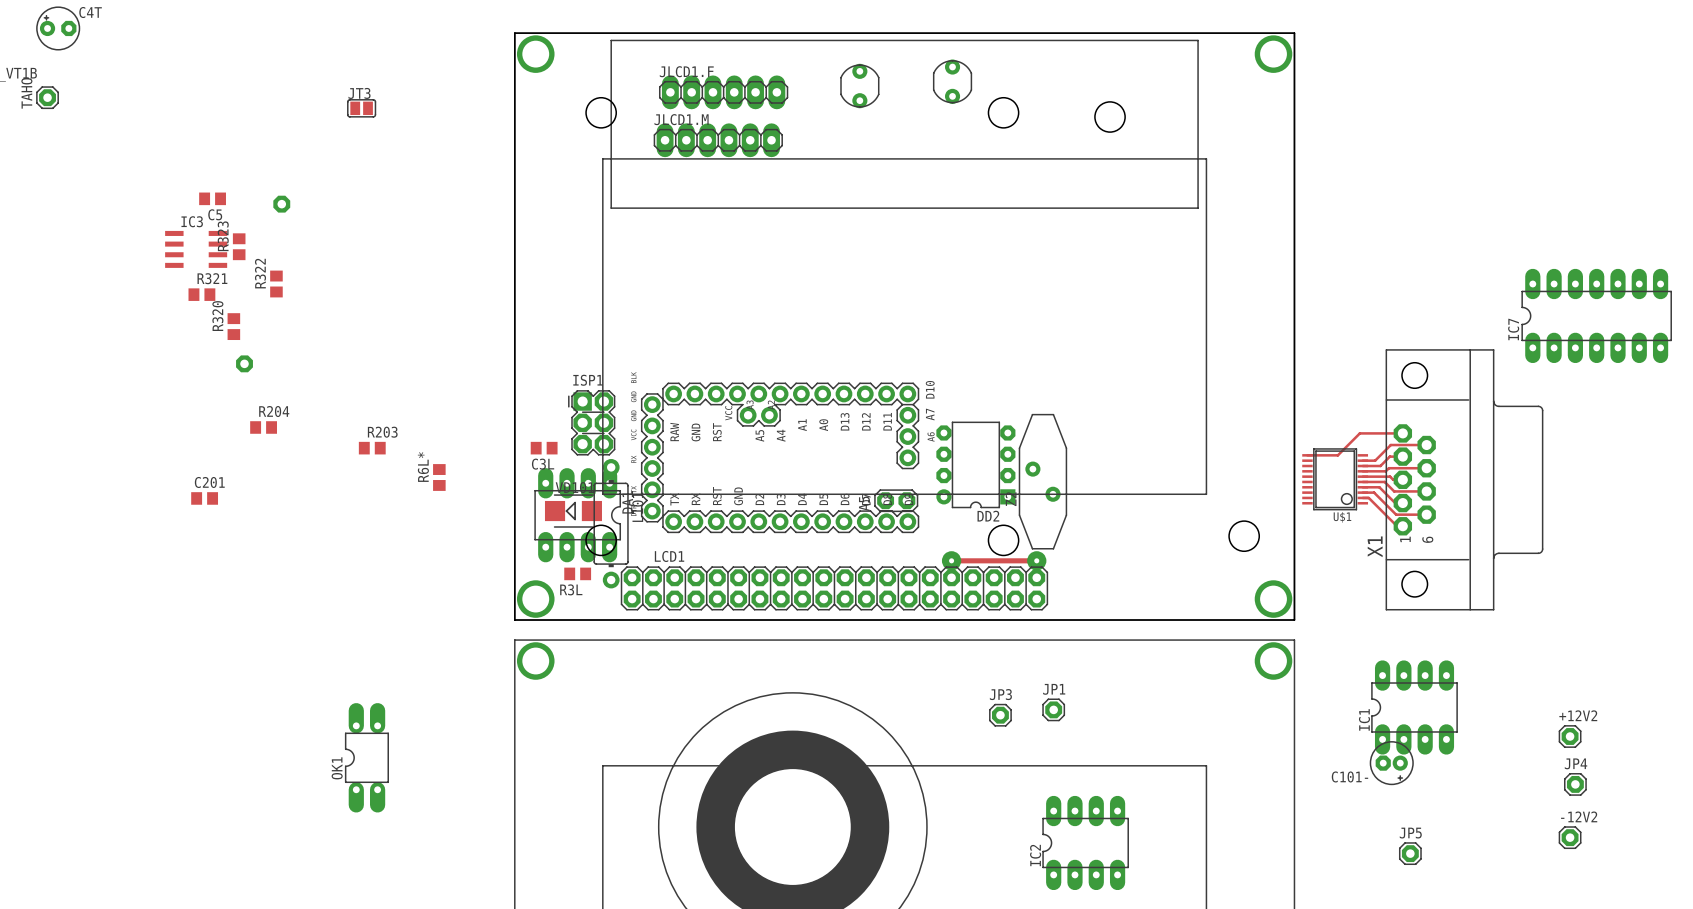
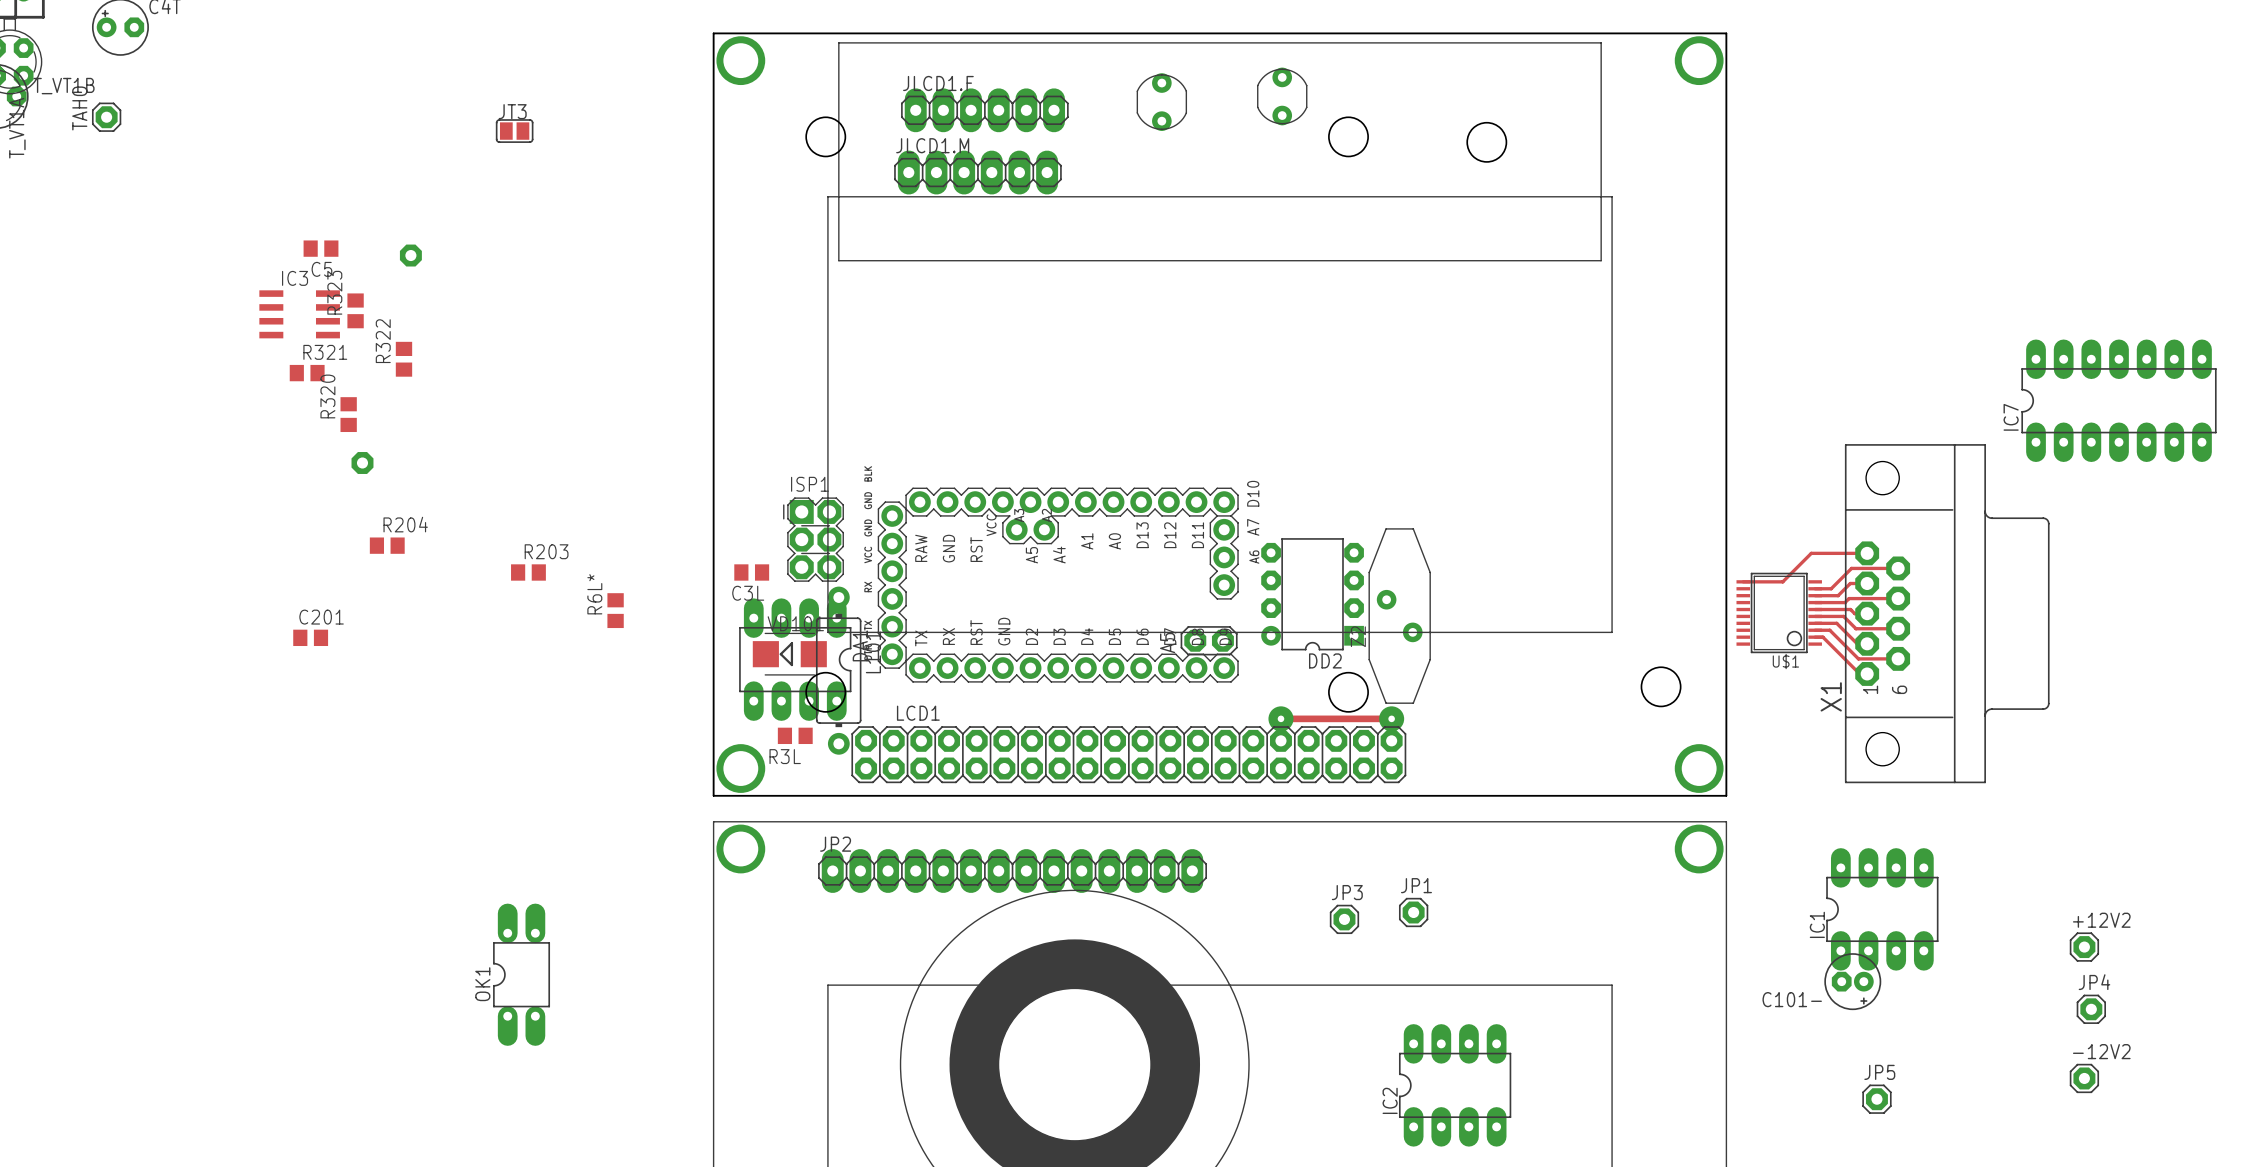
JP2: none -> (1012, 871)

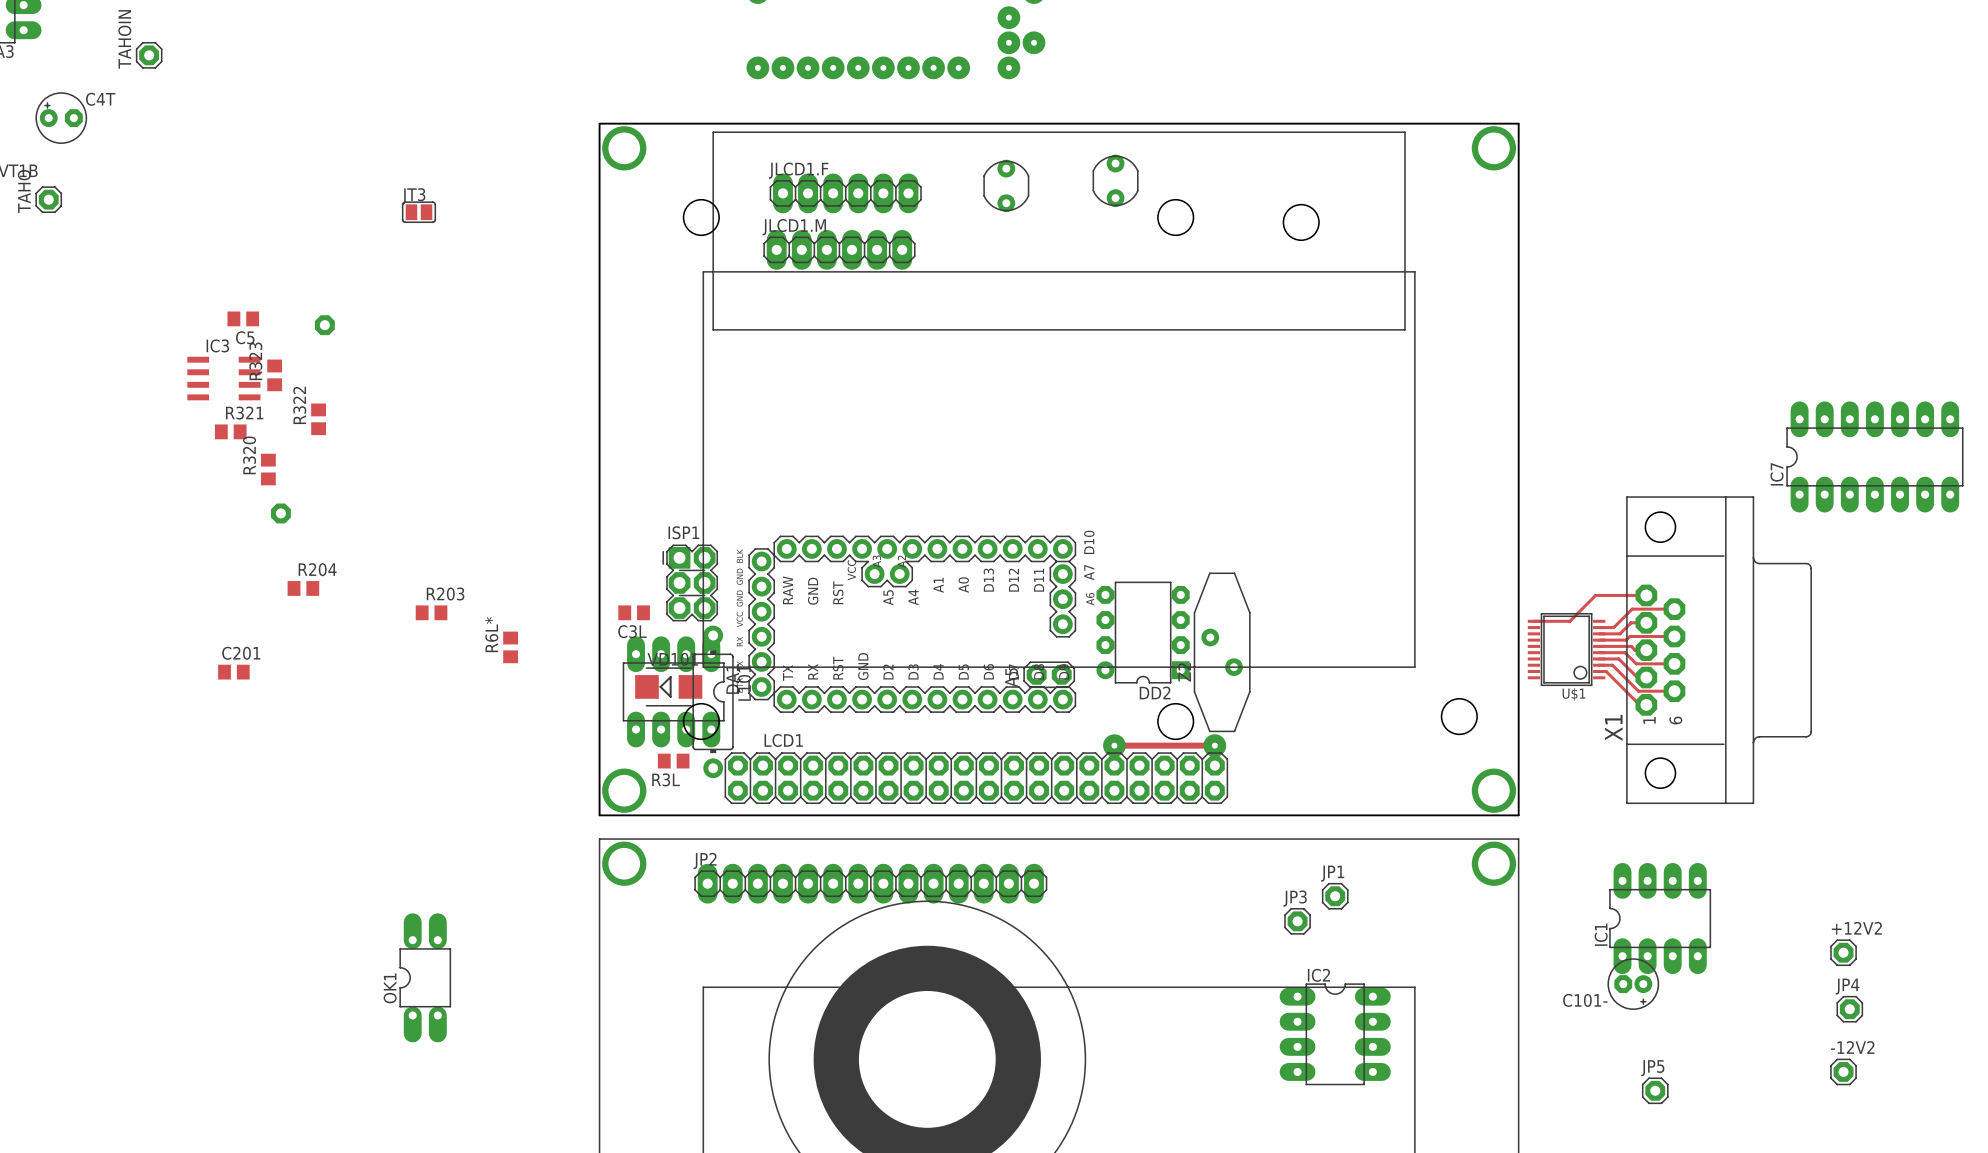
JP1 position: (1413, 912) -> (1335, 896)
JP3 position: (1344, 919) -> (1297, 921)
IC2 rotation: 0° (1455, 1085) -> 90° clockwise (1335, 1034)
IC2 position: (1455, 1085) -> (1335, 1034)

